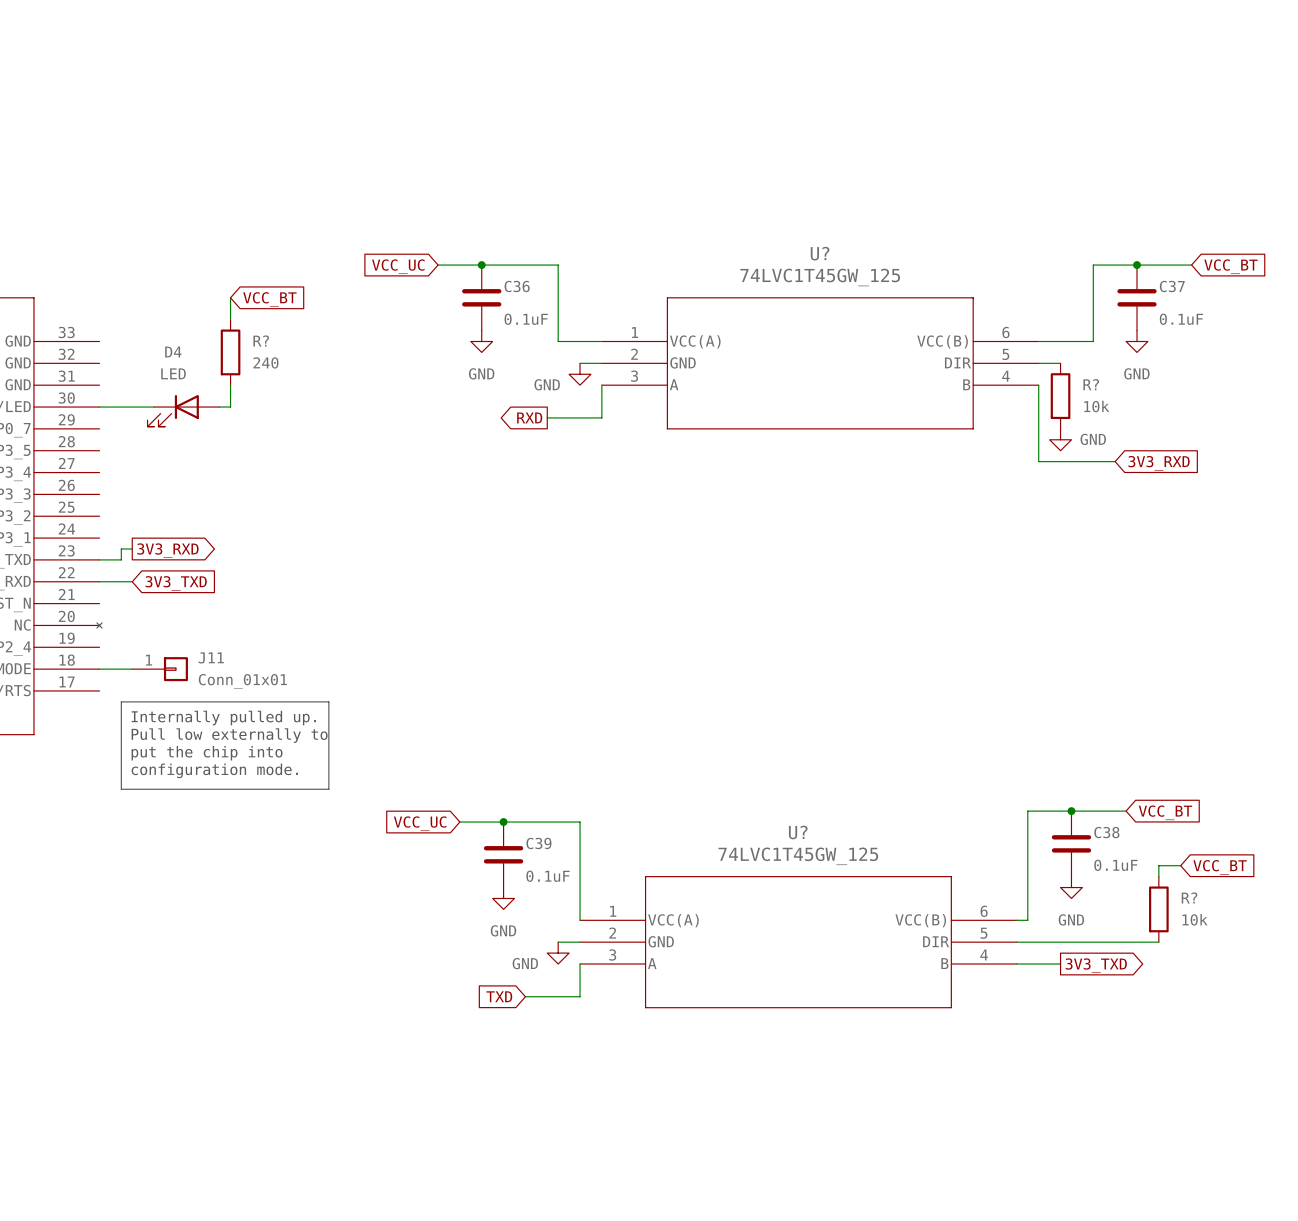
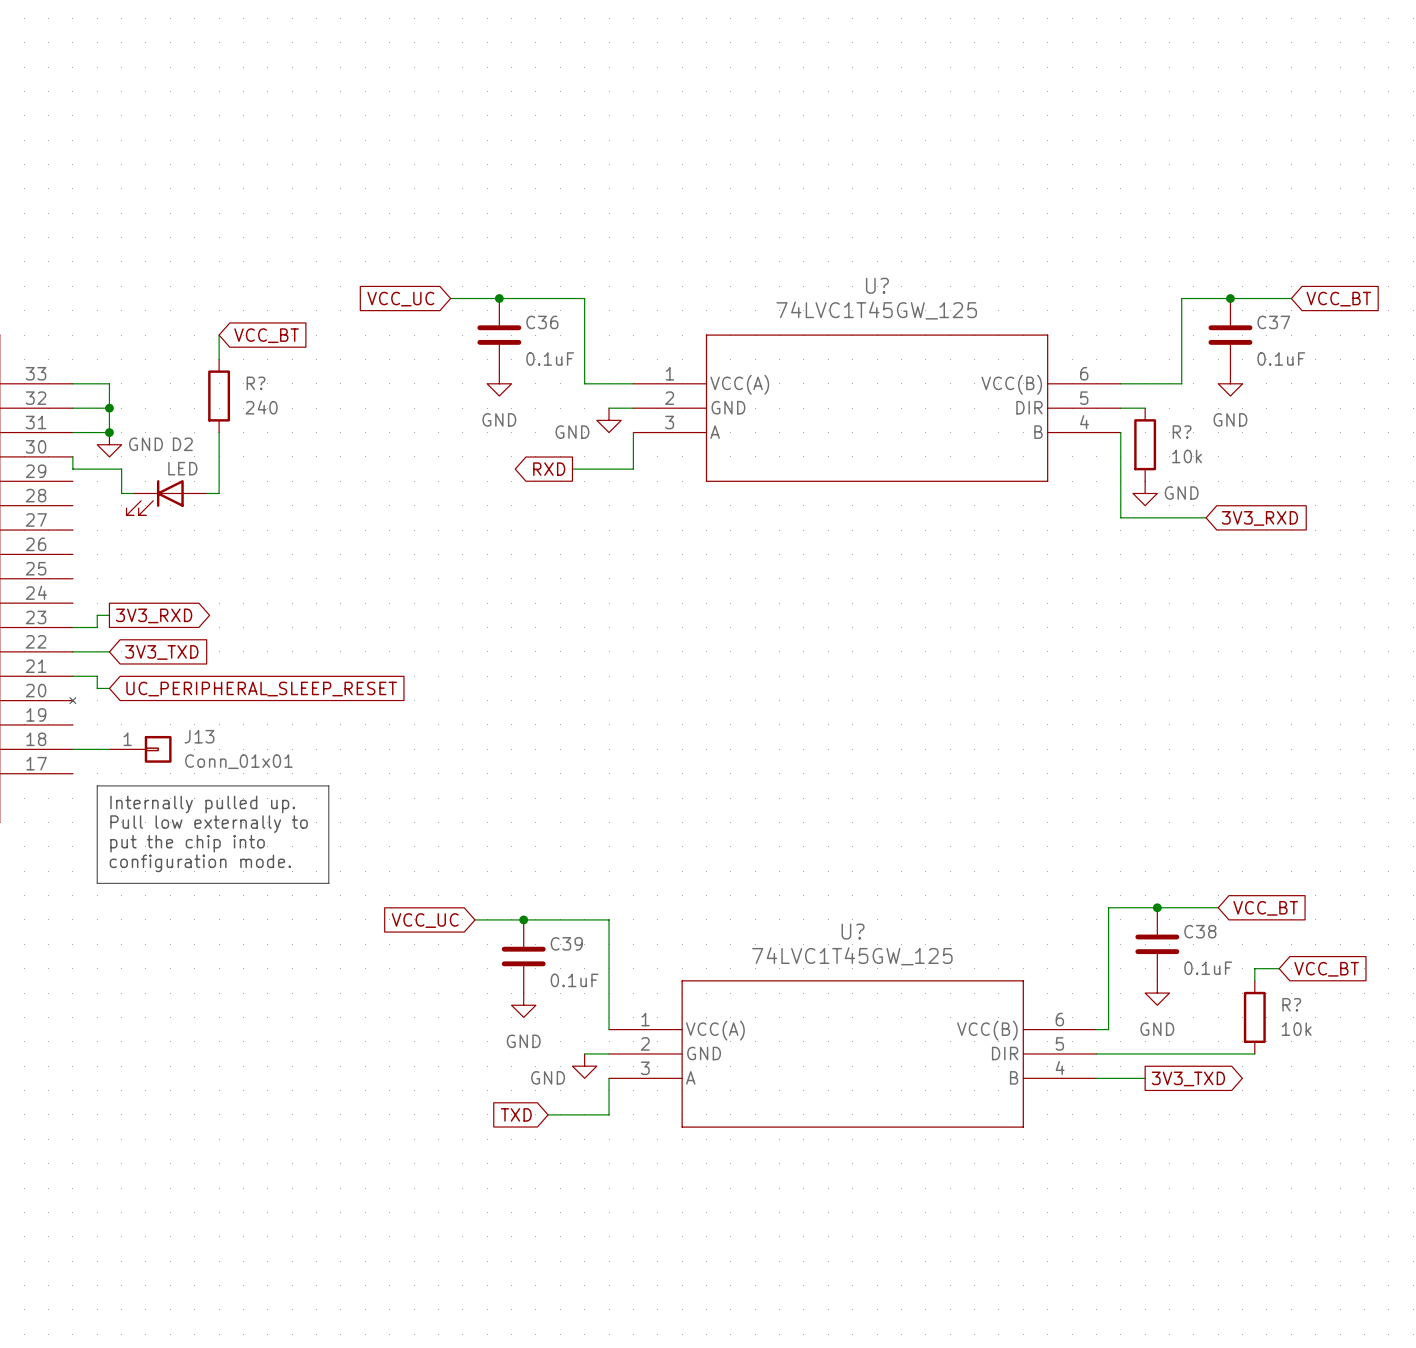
wire: none -> (72, 383) (109, 383) (109, 432) (72, 432)
wire: none -> (72, 408) (109, 408)
junction: none -> (109, 408)
junction: none -> (109, 432)
power symbol: none -> GND (109, 444)
wire: (99, 407) (154, 407) -> (72, 456) (72, 469) (121, 469) (121, 493) (133, 493)
wire: (219, 407) (230, 407) -> (206, 493) (219, 493) (219, 456)
D4: LED (183, 410) -> none
D2: none -> LED (166, 497)
wire: none -> (72, 676) (97, 676) (97, 688) (109, 688)
global label: none -> UC_PERIPHERAL_SLEEP_RESET (261, 689)
J11 name: J11 (211, 657) -> J13 (199, 736)

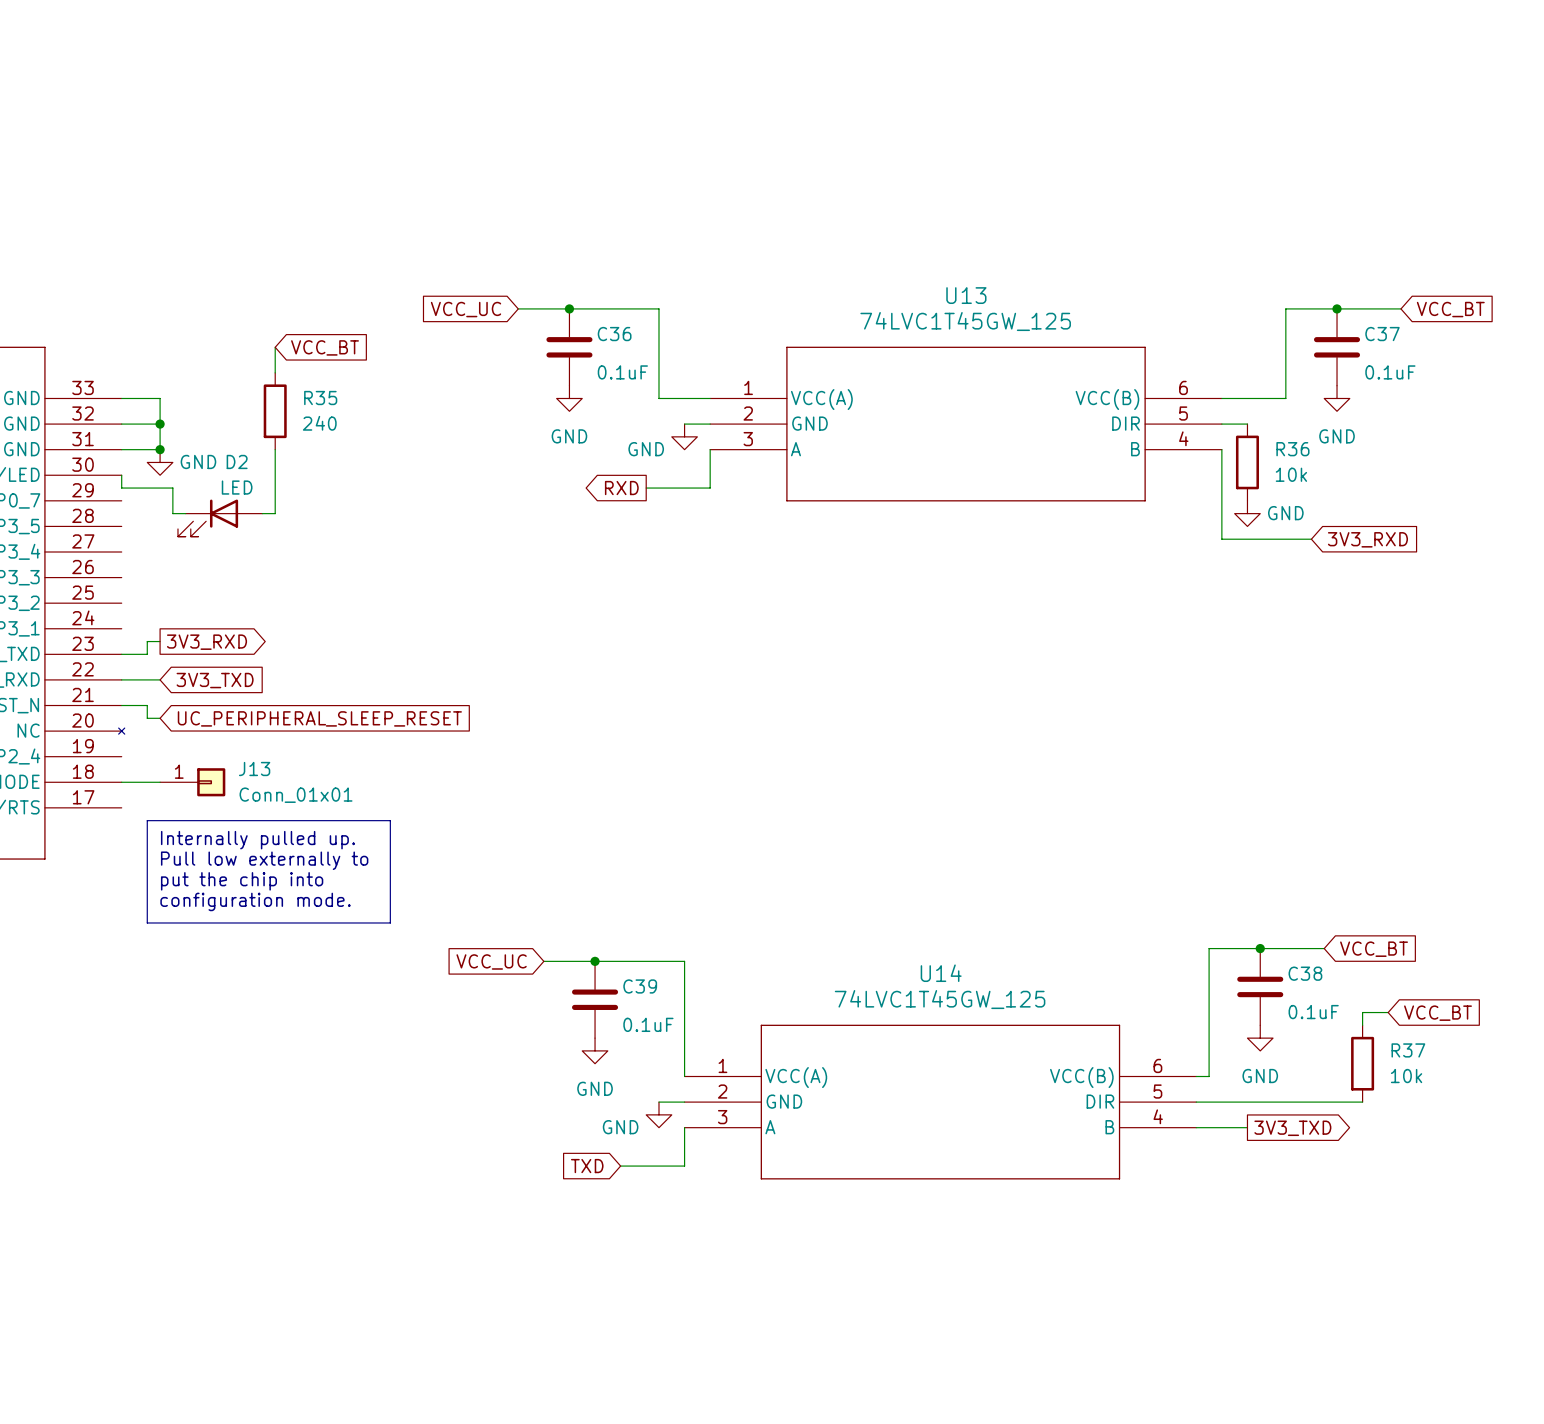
U? name: U? (877, 285) -> U13 (966, 295)
R? name: R? (256, 383) -> R35 (320, 398)
R? name: R? (1182, 432) -> R36 (1292, 449)
U? name: U? (853, 931) -> U14 (941, 973)
R? name: R? (1291, 1004) -> R37 (1408, 1050)

